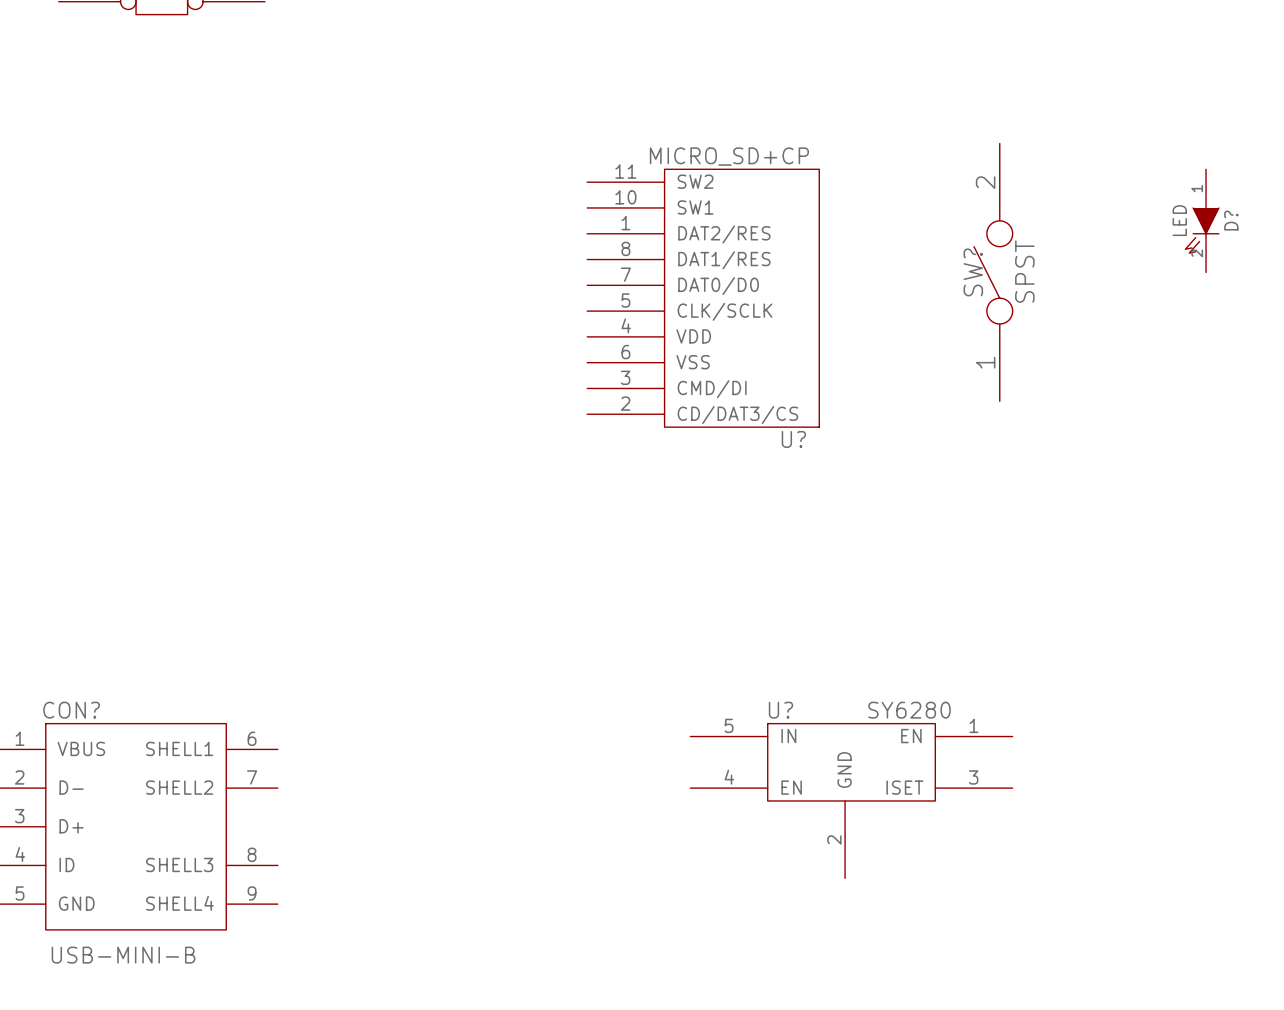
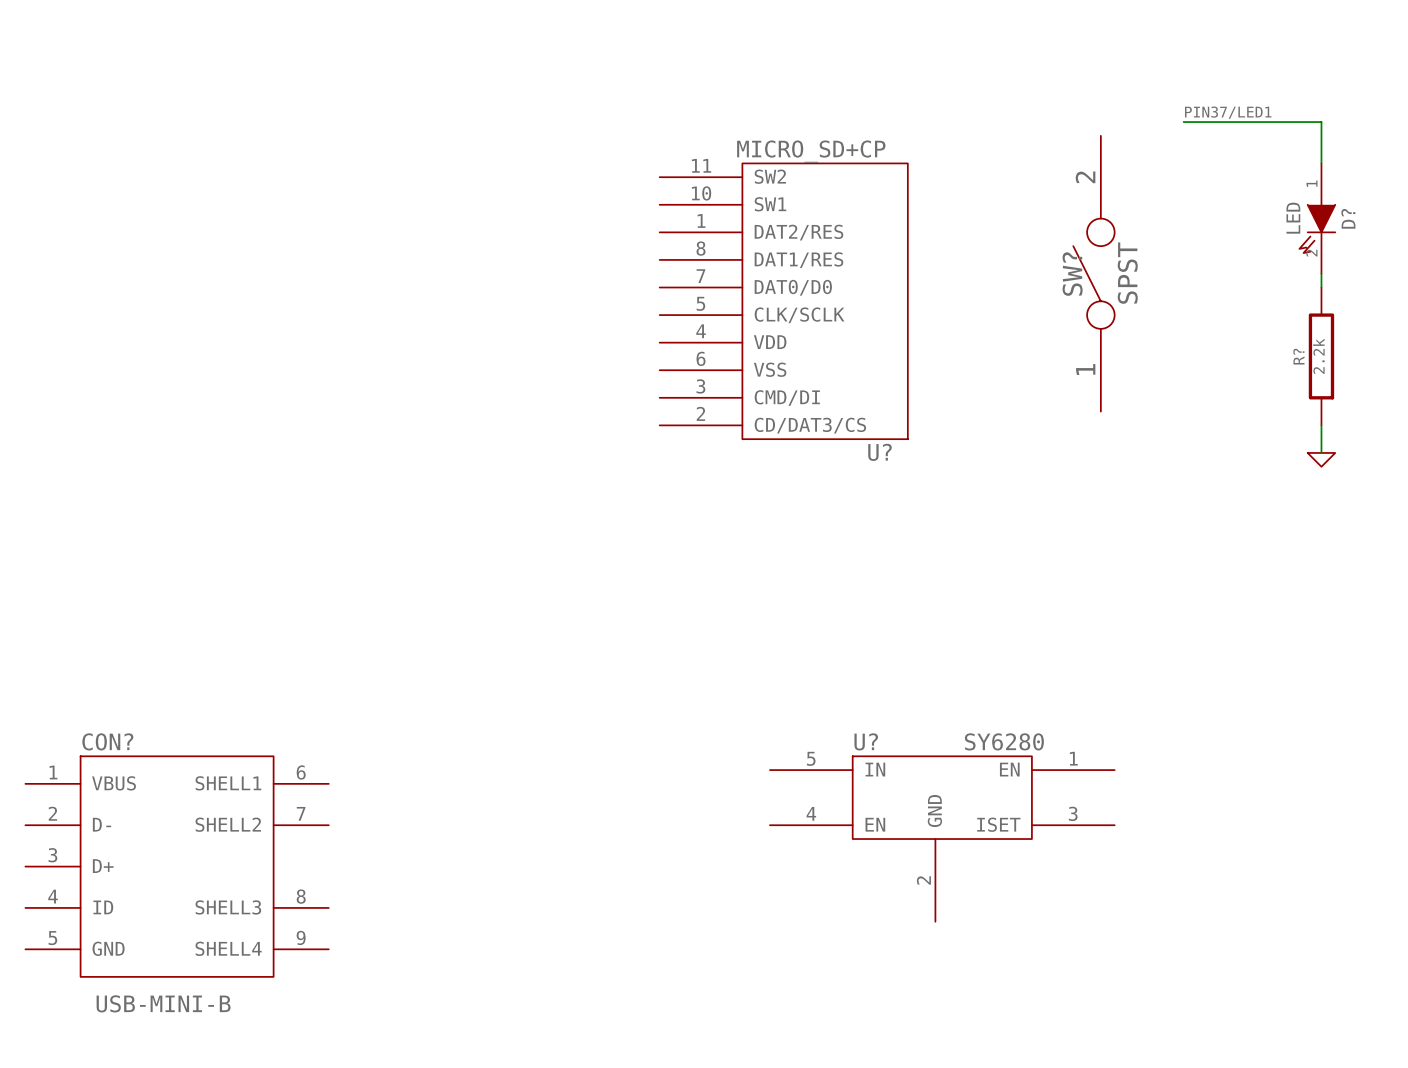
label: none -> PIN37/LED1 (1228, 112)
wire: none -> (1183, 122) (1321, 122) (1321, 163)
wire: none -> (1321, 273) (1321, 287)
R?: none -> 2.2k (1321, 356)
wire: none -> (1321, 425) (1321, 452)
power symbol: none -> (1321, 459)

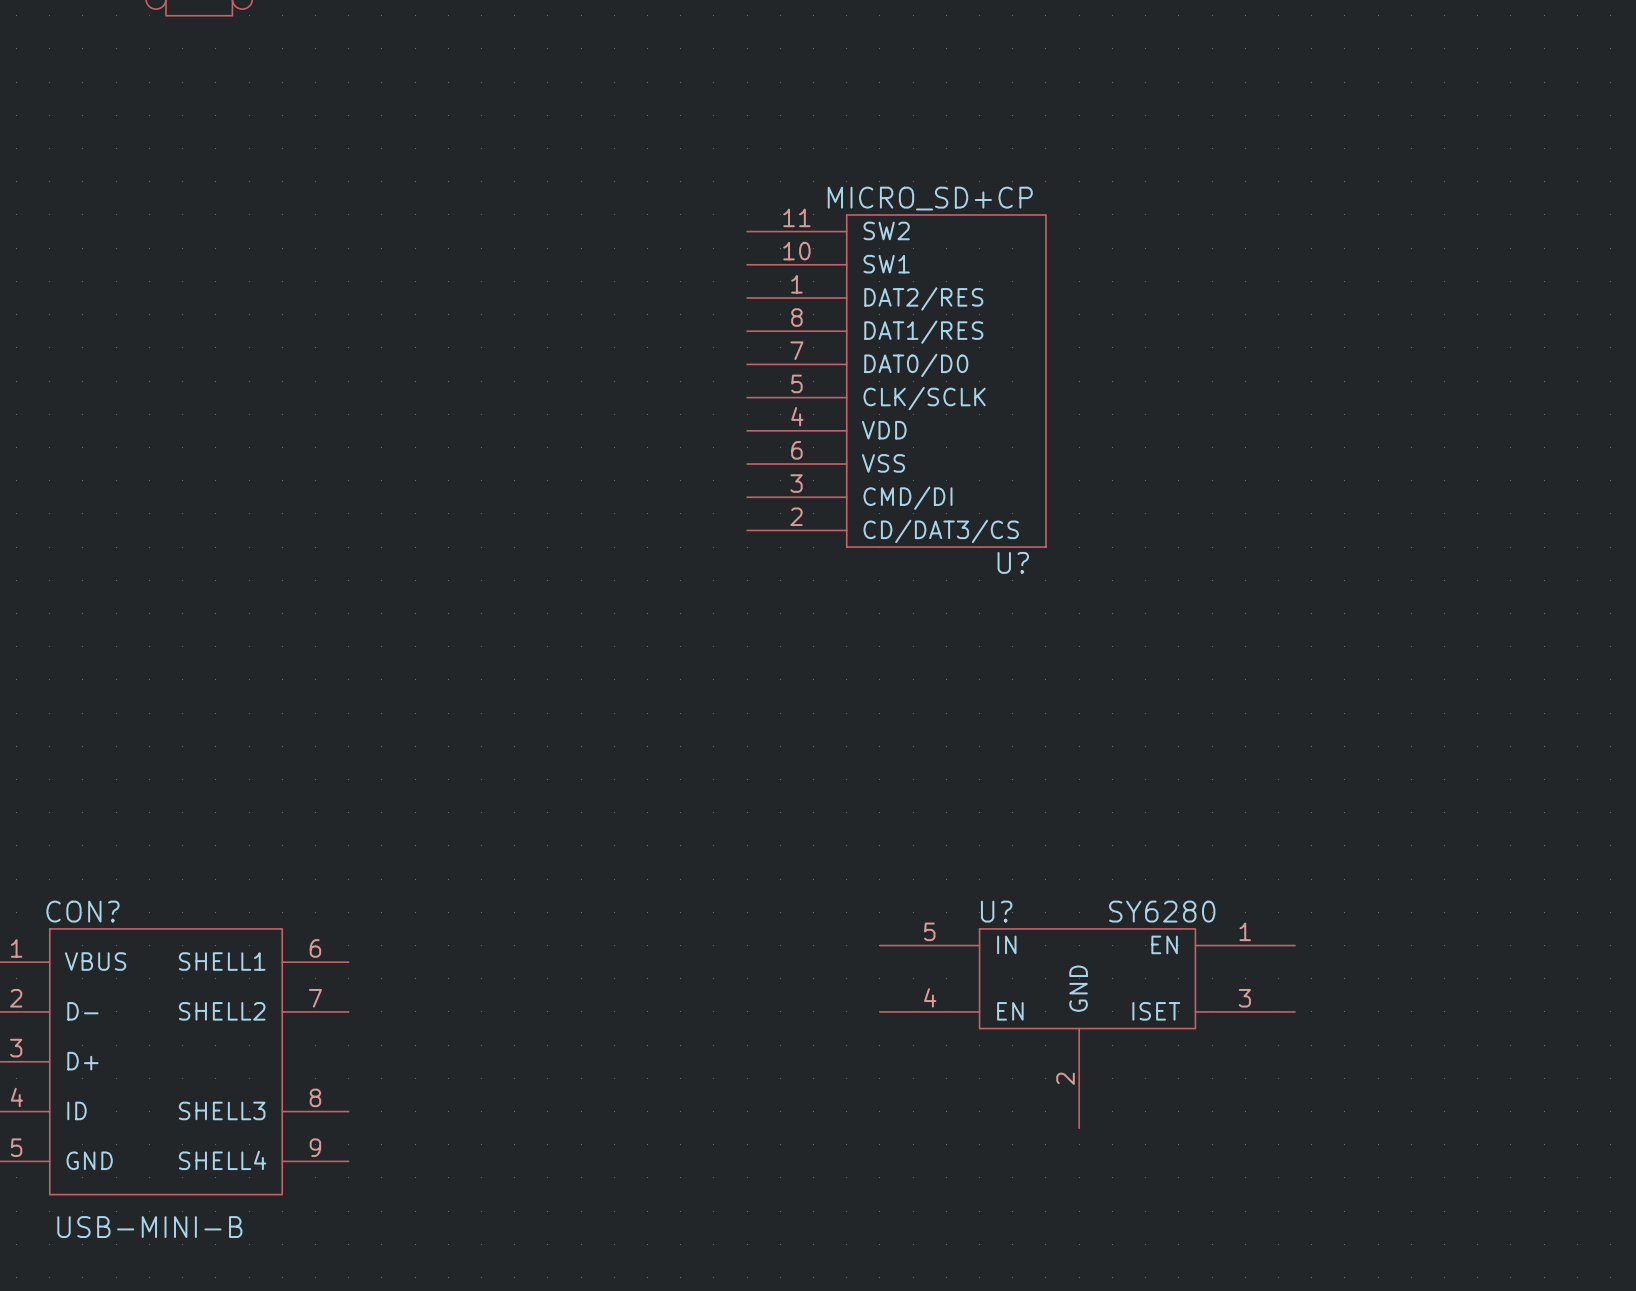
label: PIN37/LED1 (1228, 112) -> none
wire: (1183, 122) (1321, 122) (1321, 163) -> none
D?: LED (1317, 218) -> none
SW?: SPST (1093, 273) -> none
wire: (1321, 273) (1321, 287) -> none
R?: 2.2k (1321, 356) -> none
wire: (1321, 425) (1321, 452) -> none
power symbol: (1321, 459) -> none

